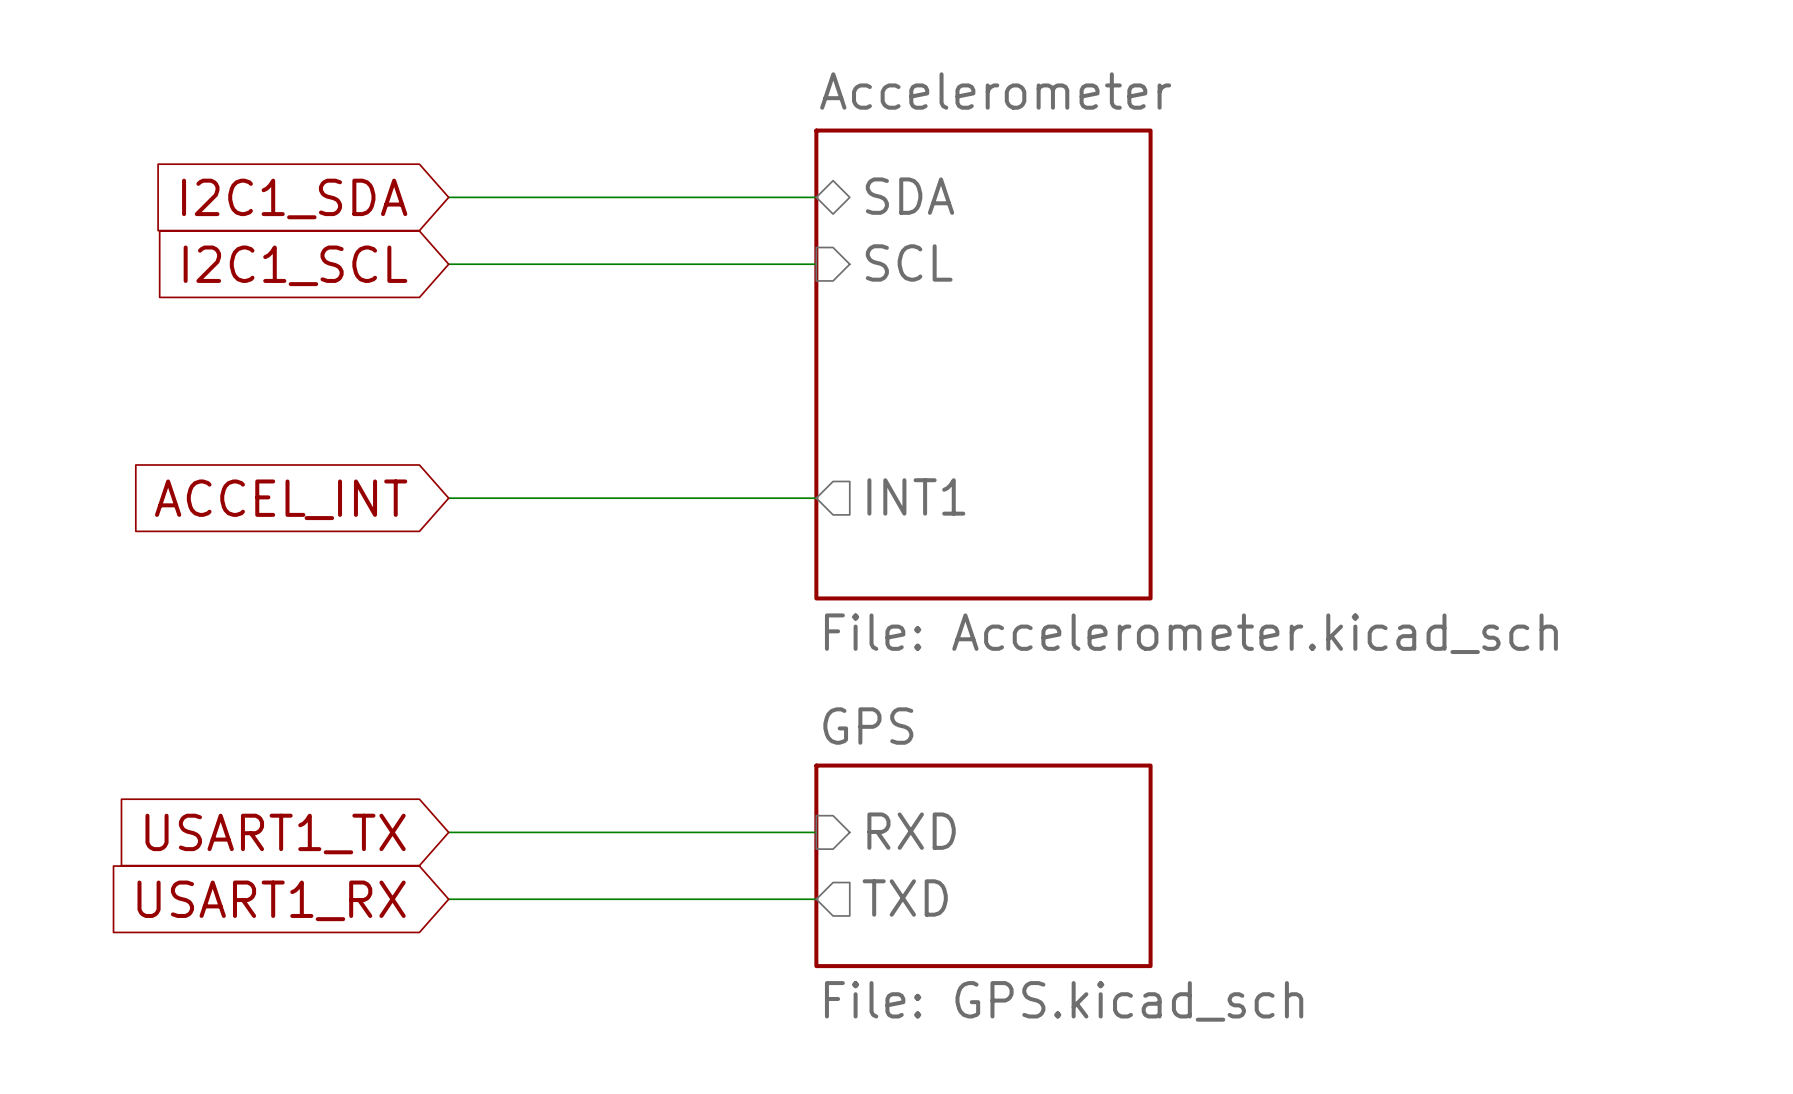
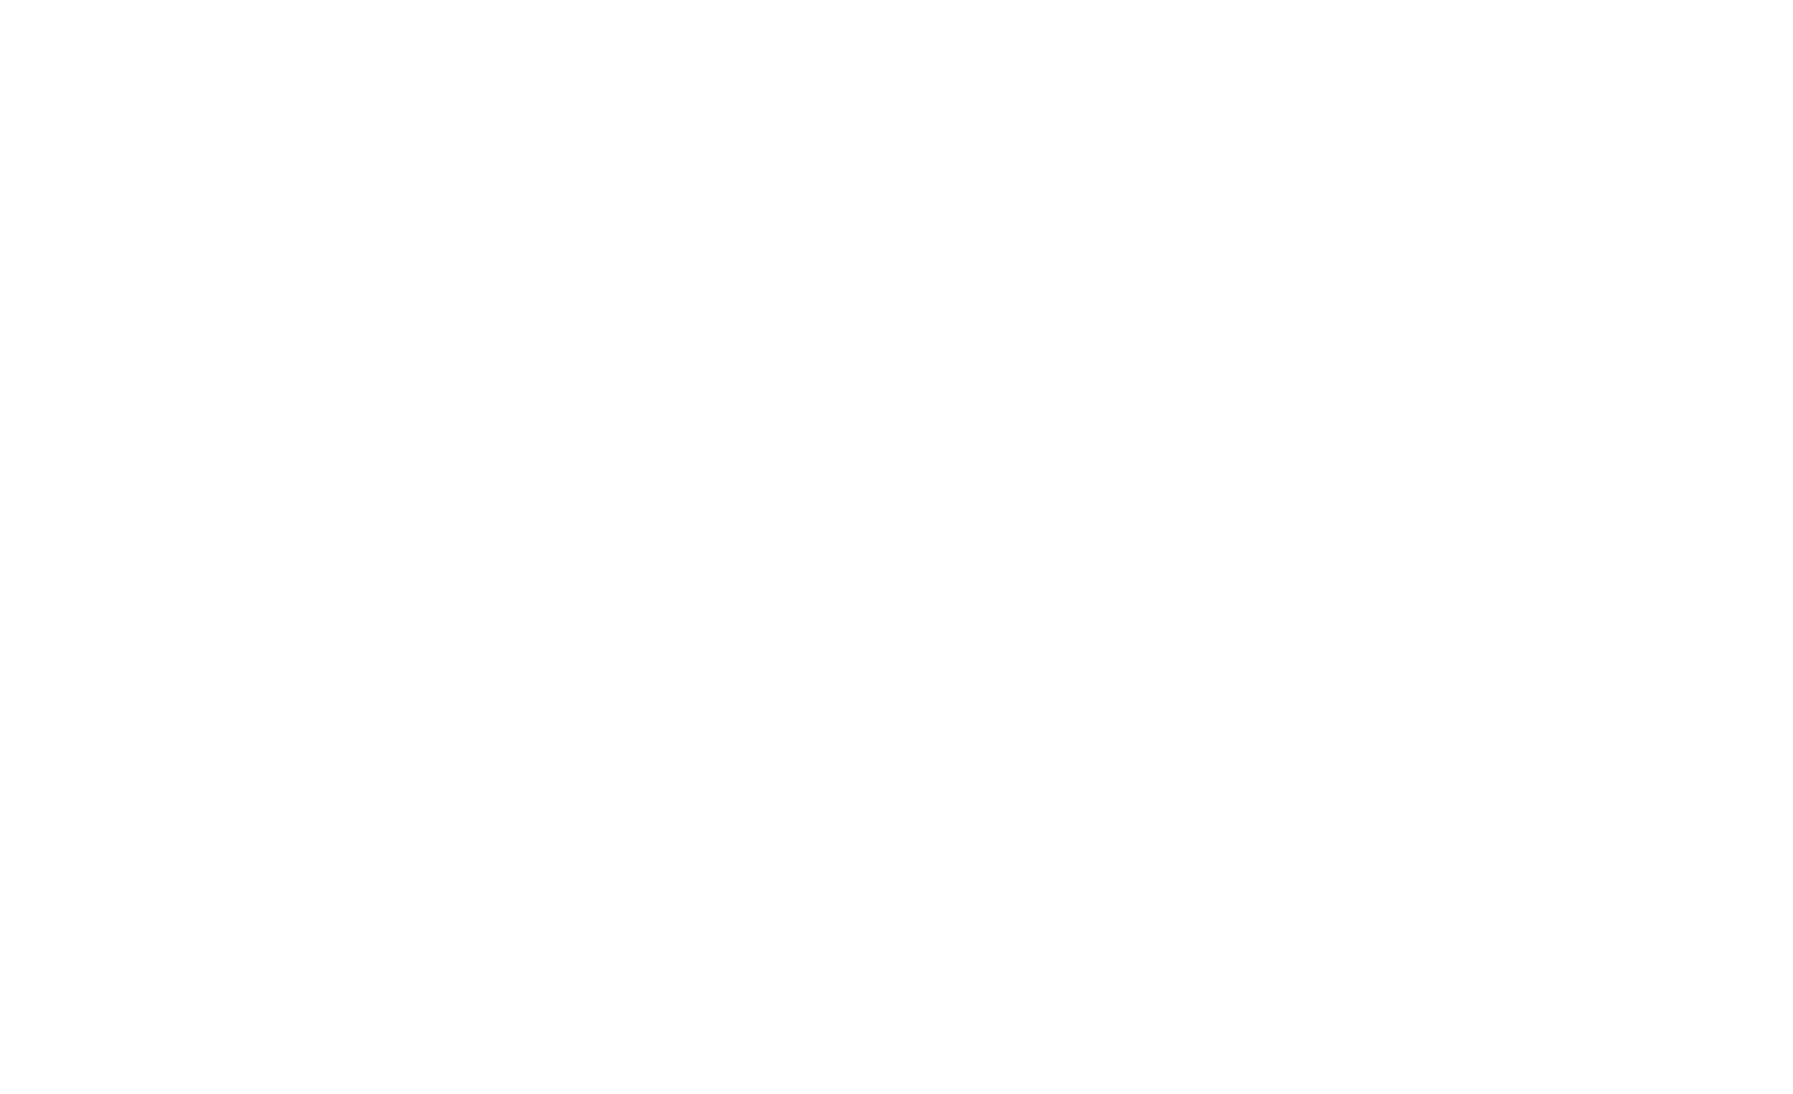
sheet pin: SDA (909, 196) -> none
wire: (448, 197) (816, 197) -> none
global label: I2C1_SDA (294, 198) -> none
sheet pin: SCL (909, 262) -> none
wire: (448, 264) (816, 264) -> none
global label: I2C1_SCL (295, 265) -> none
sheet Accelerometer: File: Accelerometer.kicad_sch (983, 364) -> none
sheet pin: INT1 (916, 496) -> none
wire: (448, 498) (816, 498) -> none
global label: ACCEL_INT (281, 499) -> none
sheet pin: RXD (911, 831) -> none
wire: (448, 832) (816, 832) -> none
global label: USART1_TX (275, 834) -> none
sheet GPS: File: GPS.kicad_sch (983, 865) -> none
sheet pin: TXD (905, 898) -> none
wire: (448, 899) (816, 899) -> none
global label: USART1_RX (271, 900) -> none

